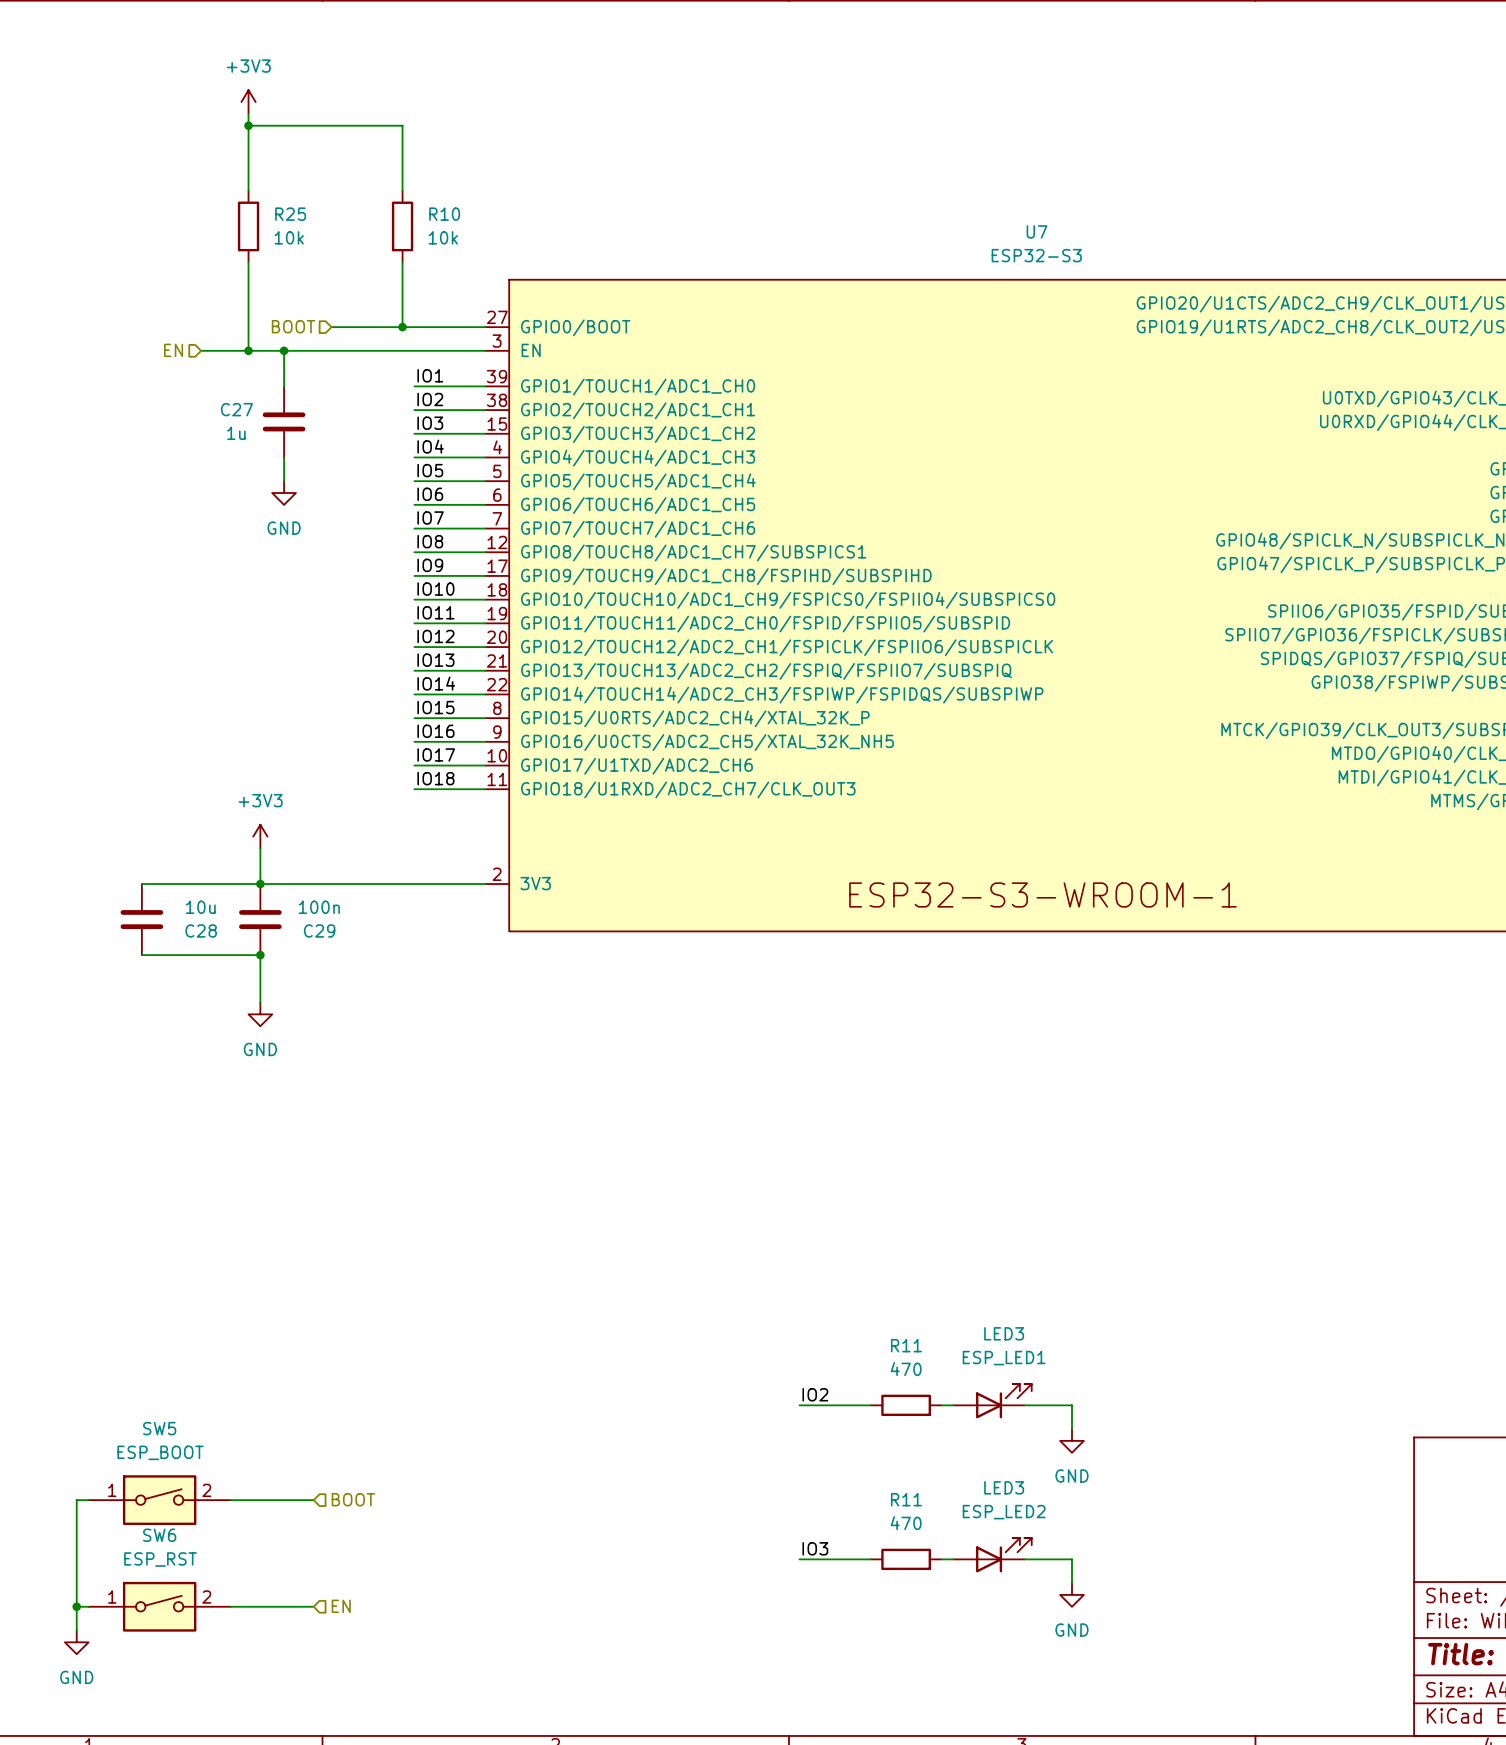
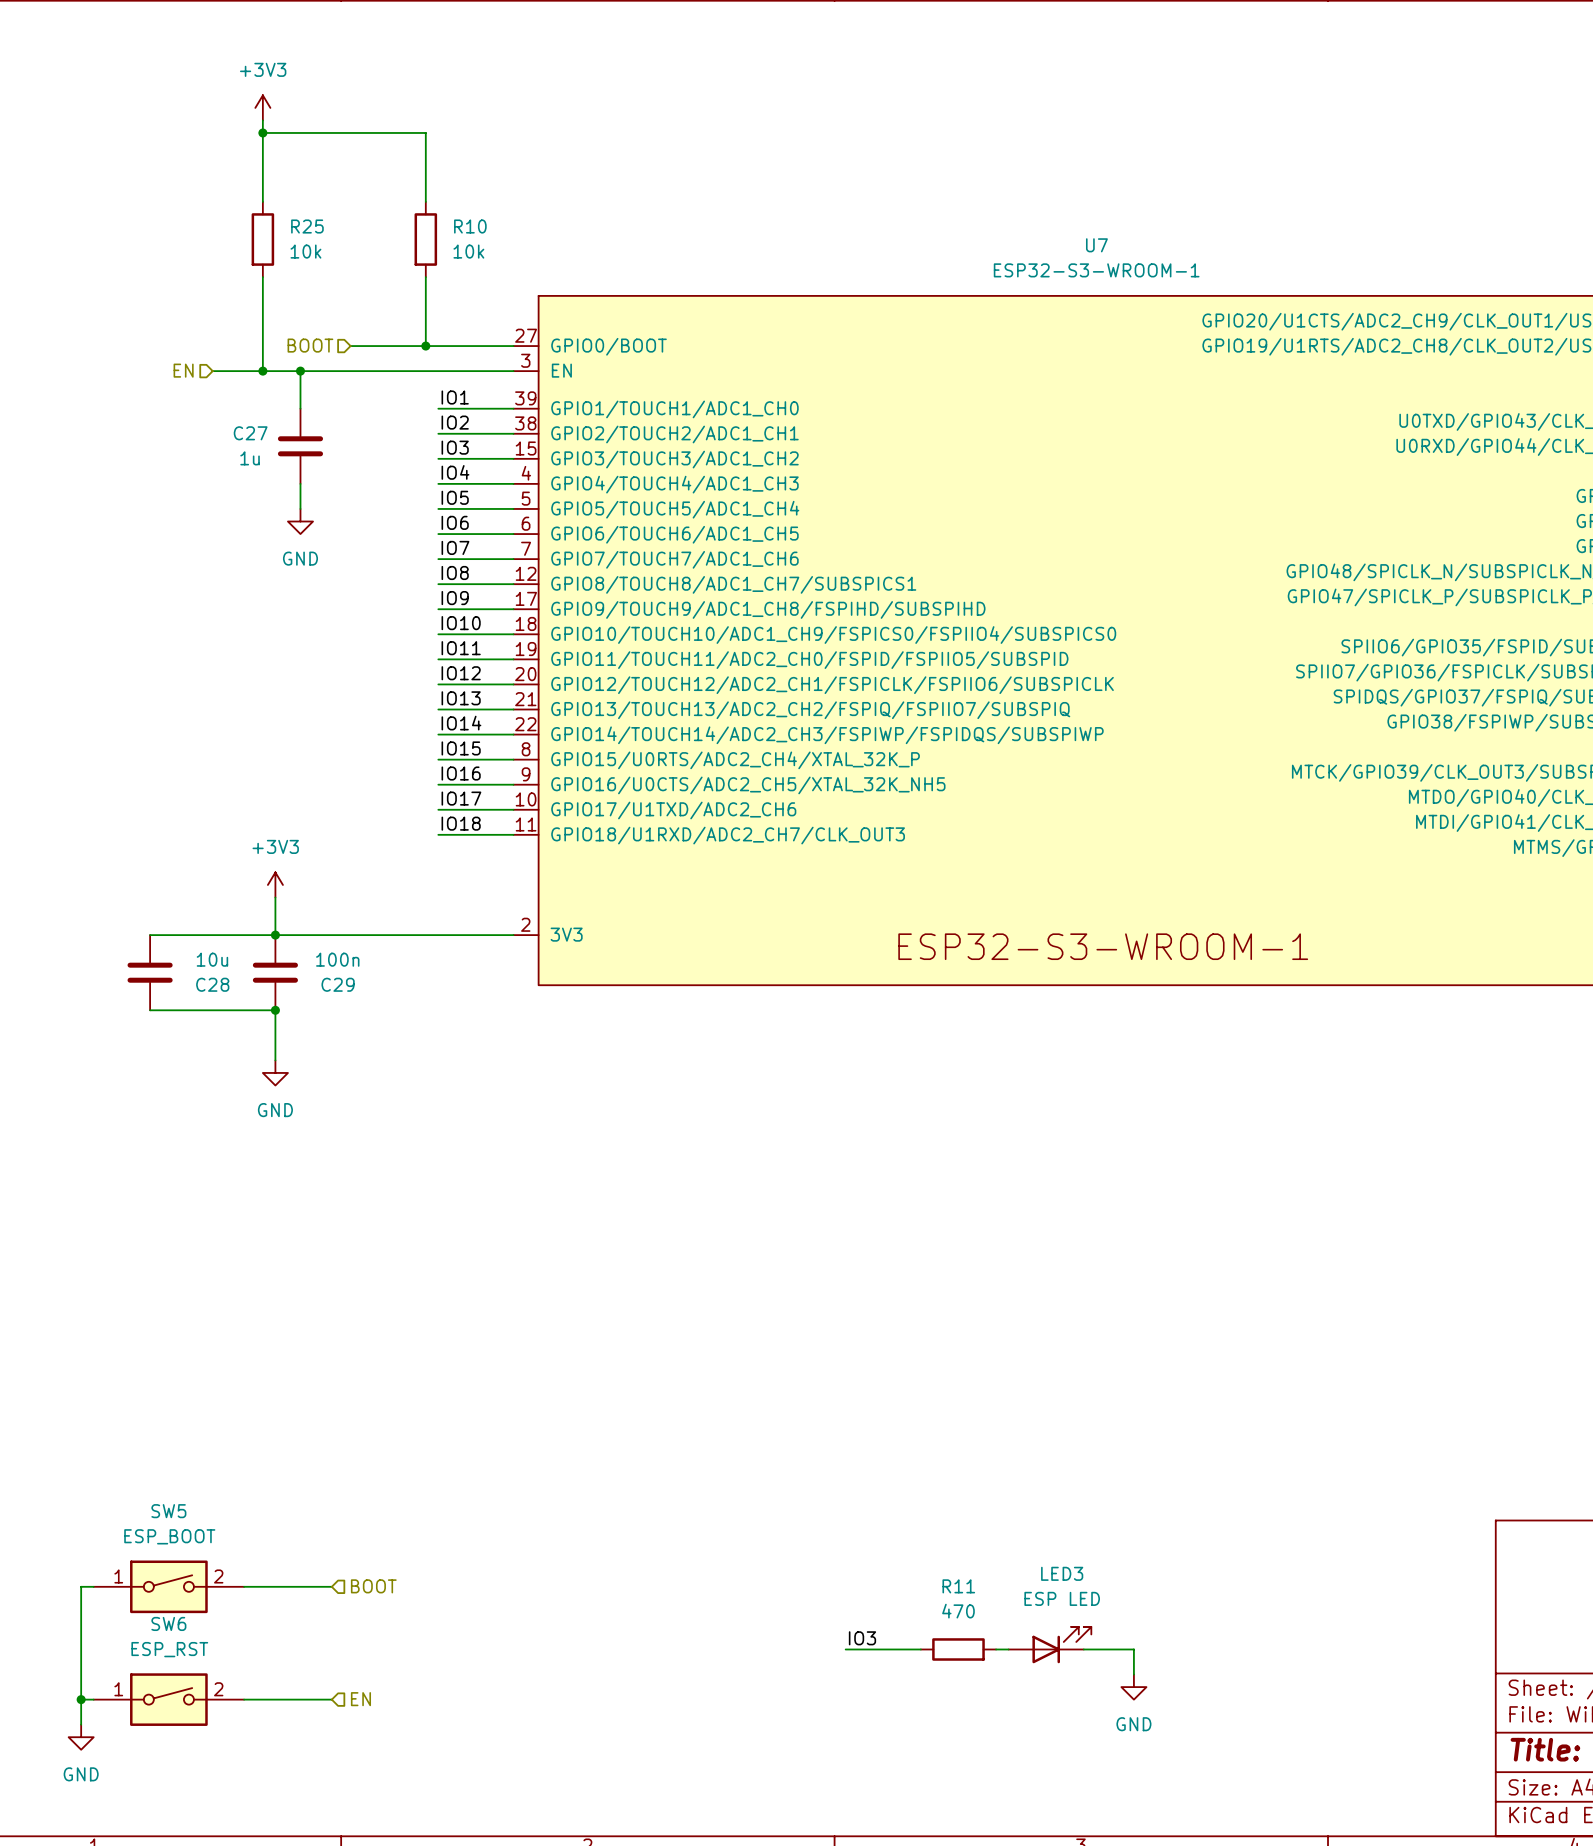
U7 value: ESP32-S3 (1036, 255) -> ESP32-S3-WROOM-1 (1096, 270)
label: IO2 (815, 1394) -> none
LED3: ESP_LED1 (992, 1401) -> none
wire: (799, 1405) (870, 1405) -> none
R11: 470 (906, 1405) -> none
wire: (941, 1405) (953, 1405) -> none
wire: (1024, 1405) (1071, 1405) (1071, 1429) -> none
power symbol: GND (1071, 1440) -> none
LED3 value: ESP_LED2 (1004, 1512) -> ESP LED (1062, 1598)

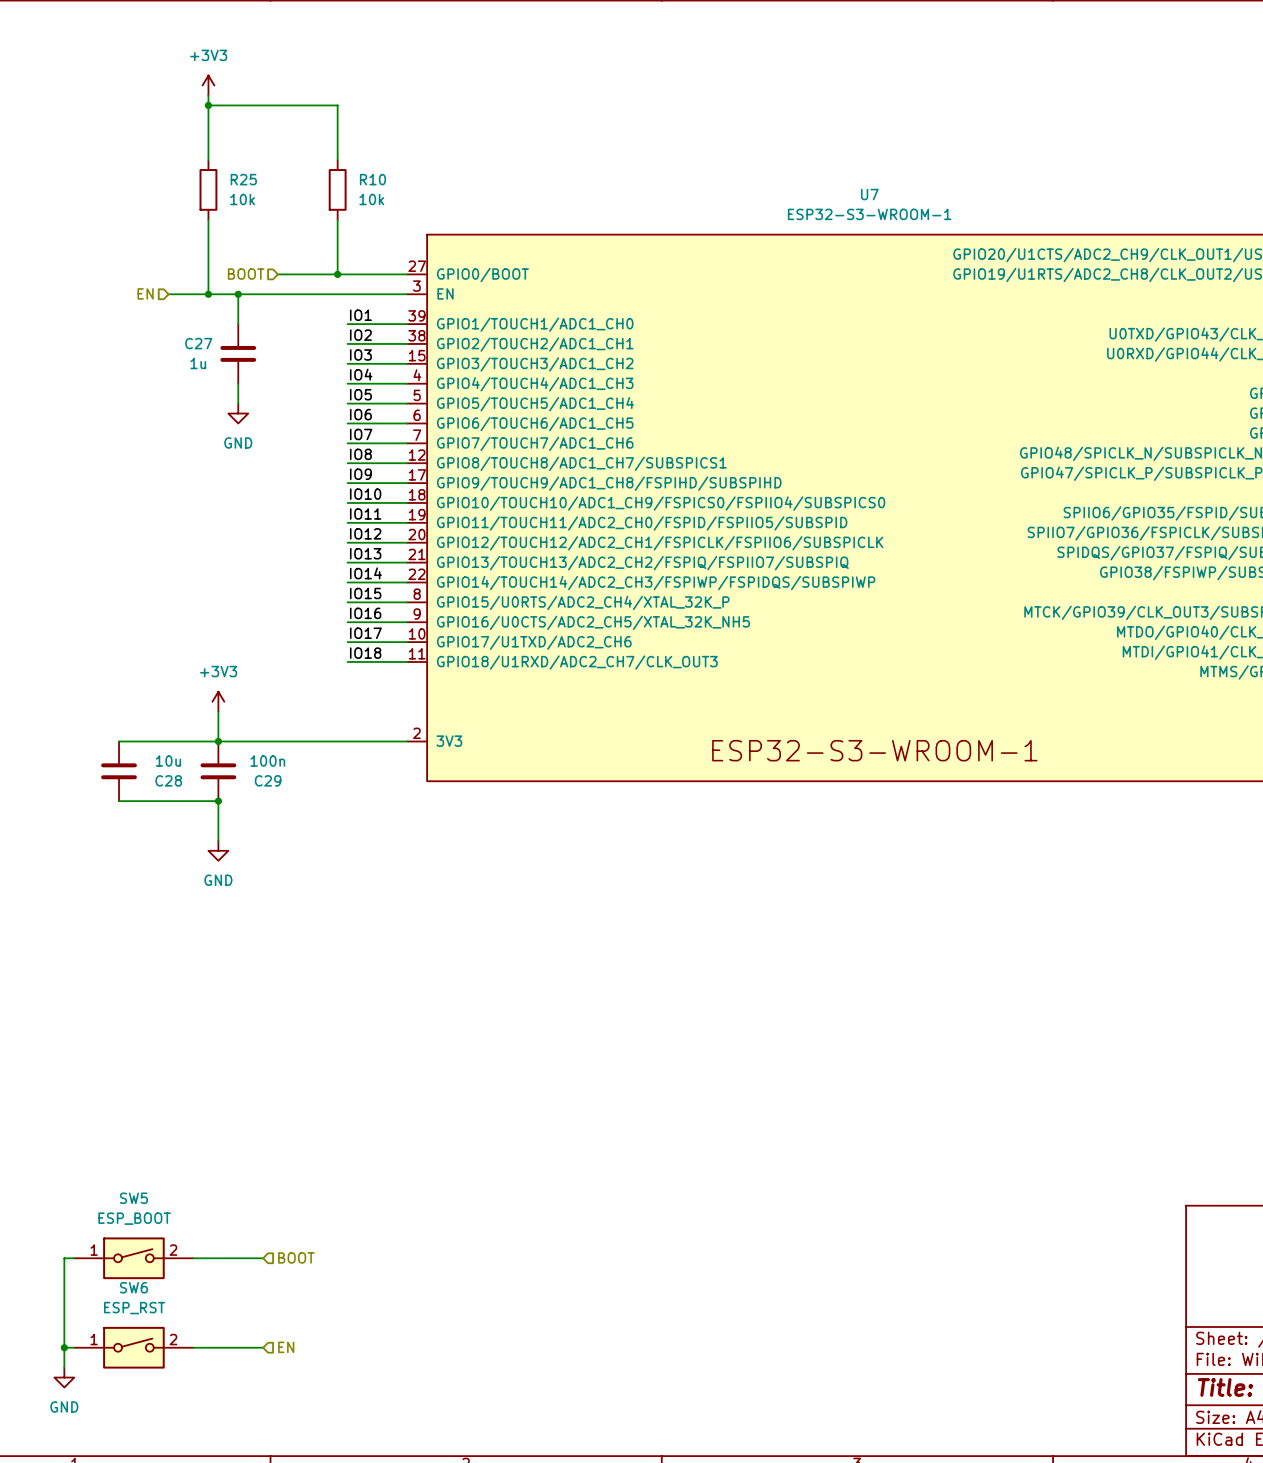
label: IO3 (862, 1638) -> none
LED3: ESP LED (1049, 1645) -> none
wire: (845, 1649) (920, 1649) -> none
R11: 470 (958, 1649) -> none
wire: (996, 1649) (1008, 1649) -> none
wire: (1083, 1649) (1133, 1649) (1133, 1674) -> none
power symbol: GND (1133, 1687) -> none

